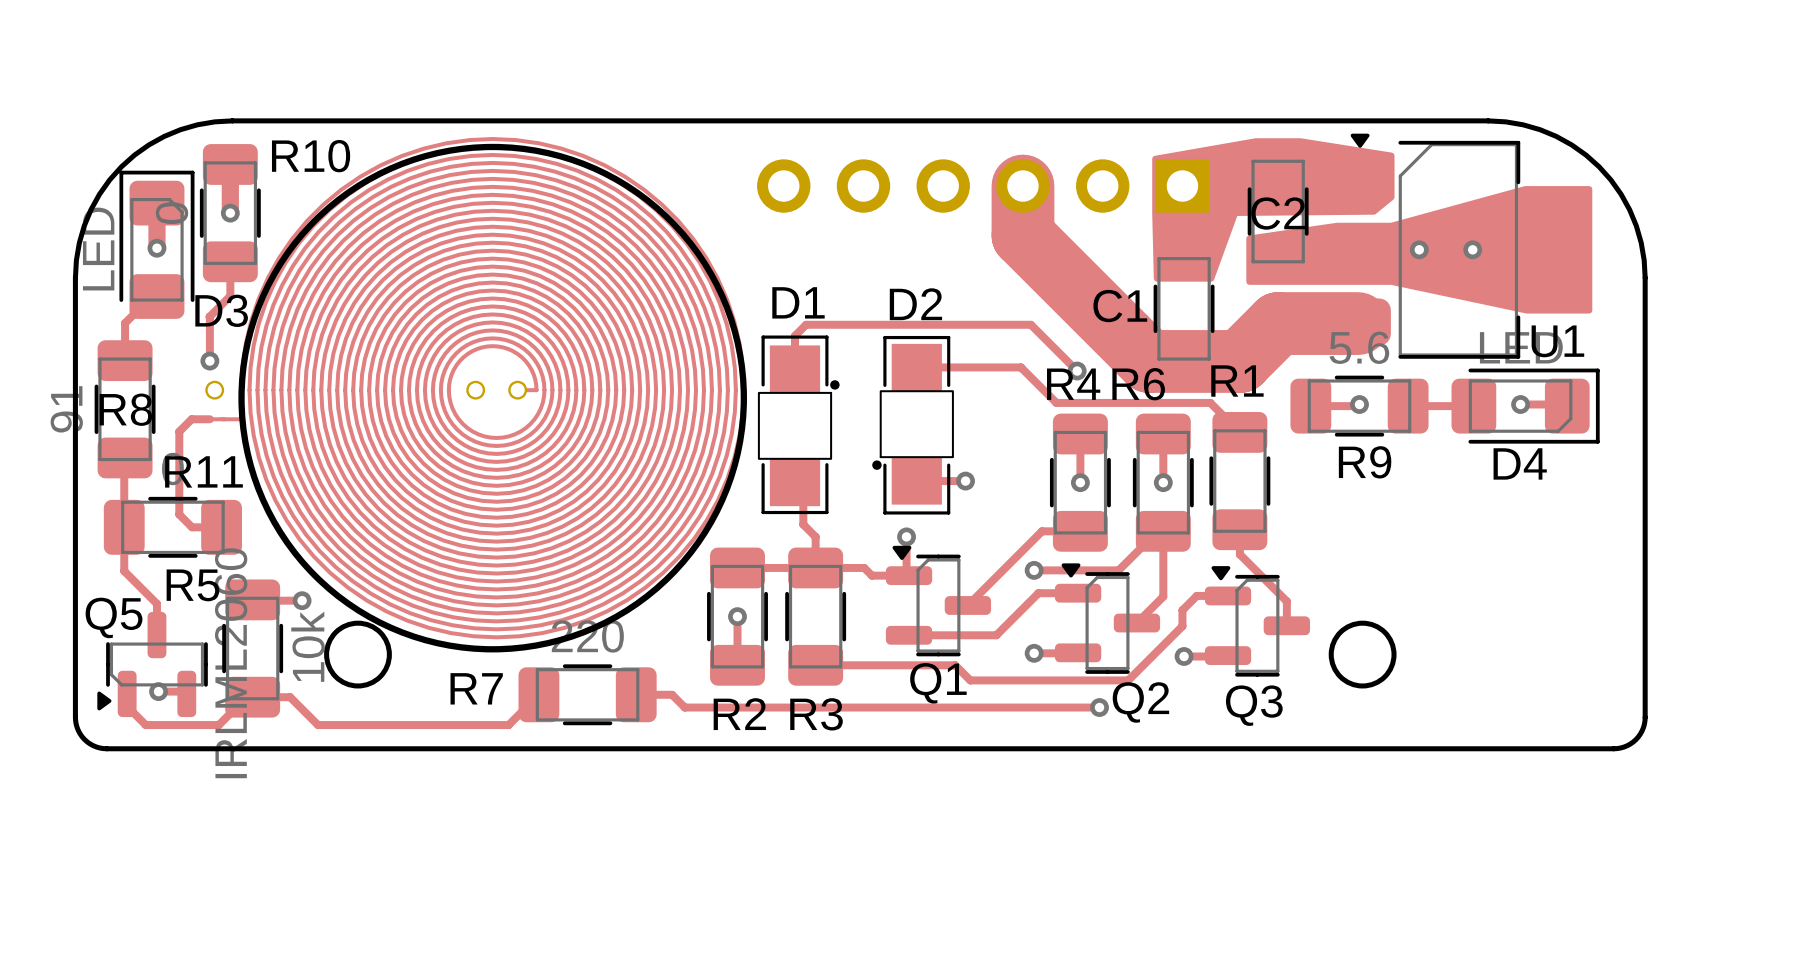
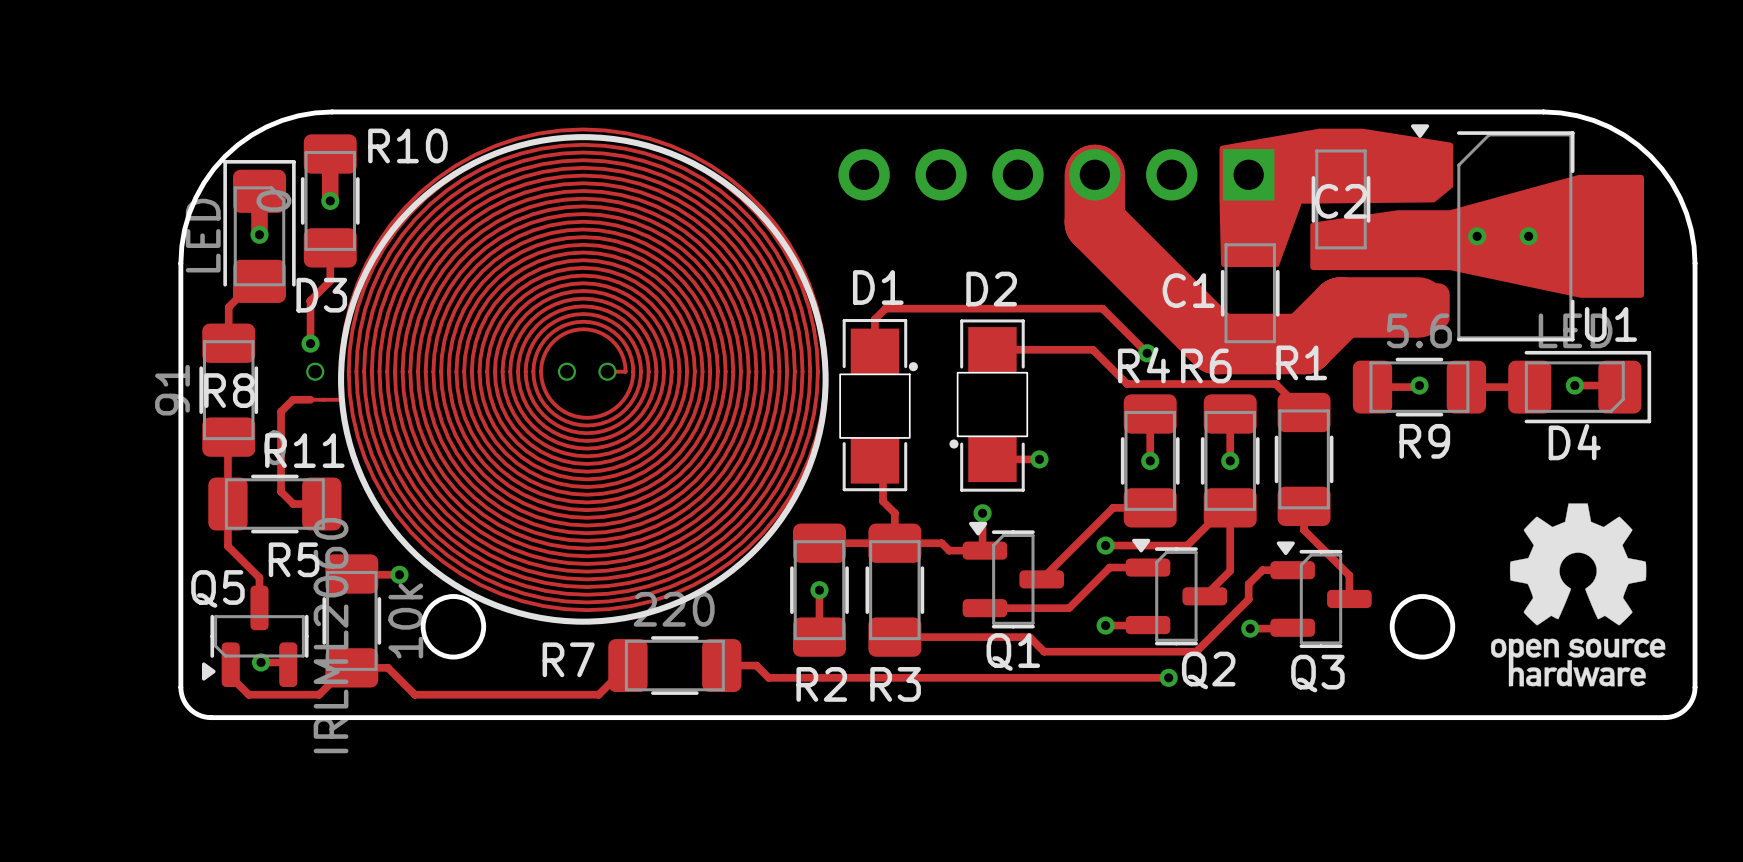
drawing: none -> [1490, 503, 1666, 687]

